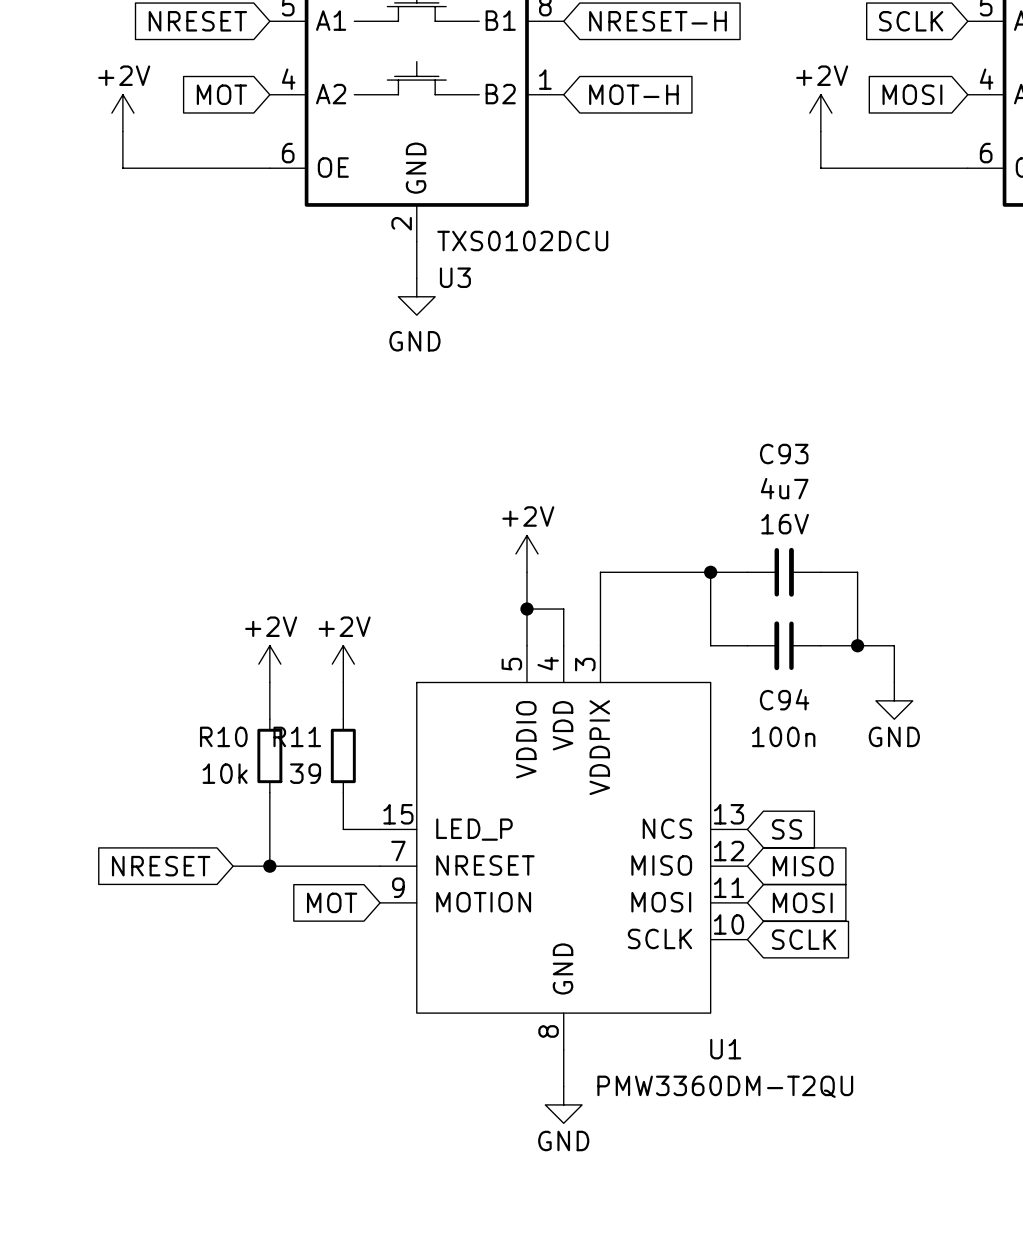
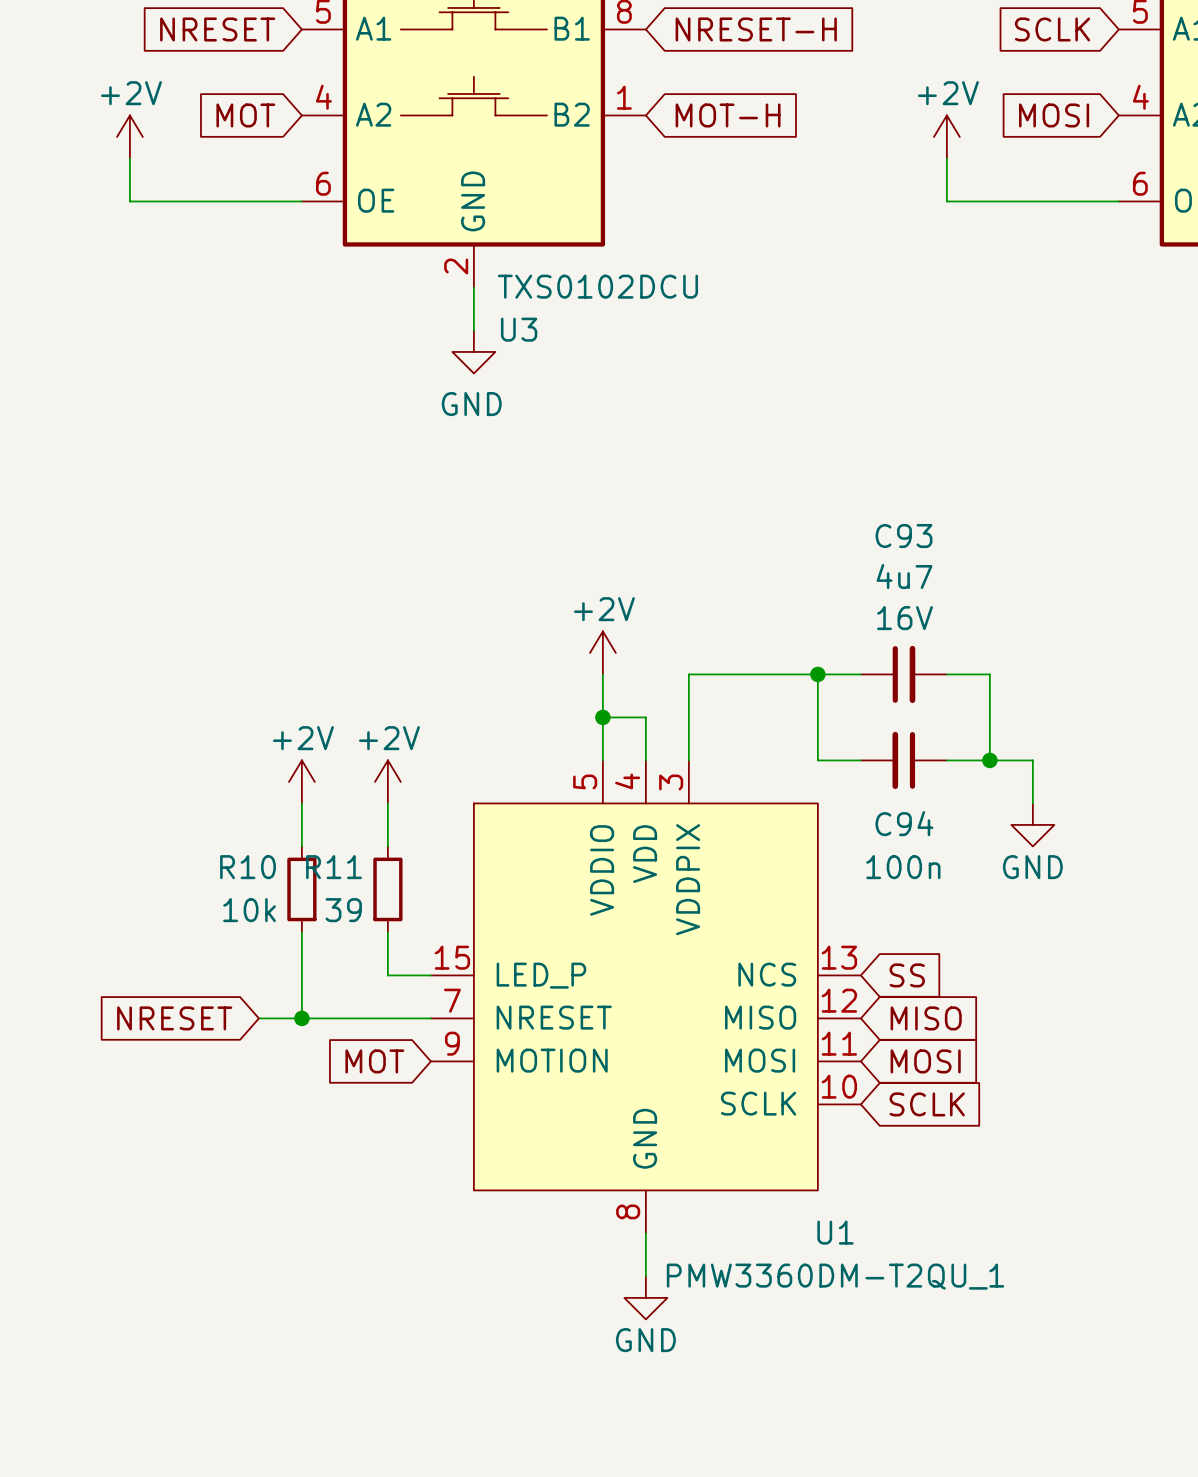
U1 value: PMW3360DM-T2QU (725, 1086) -> PMW3360DM-T2QU_1 (835, 1276)

